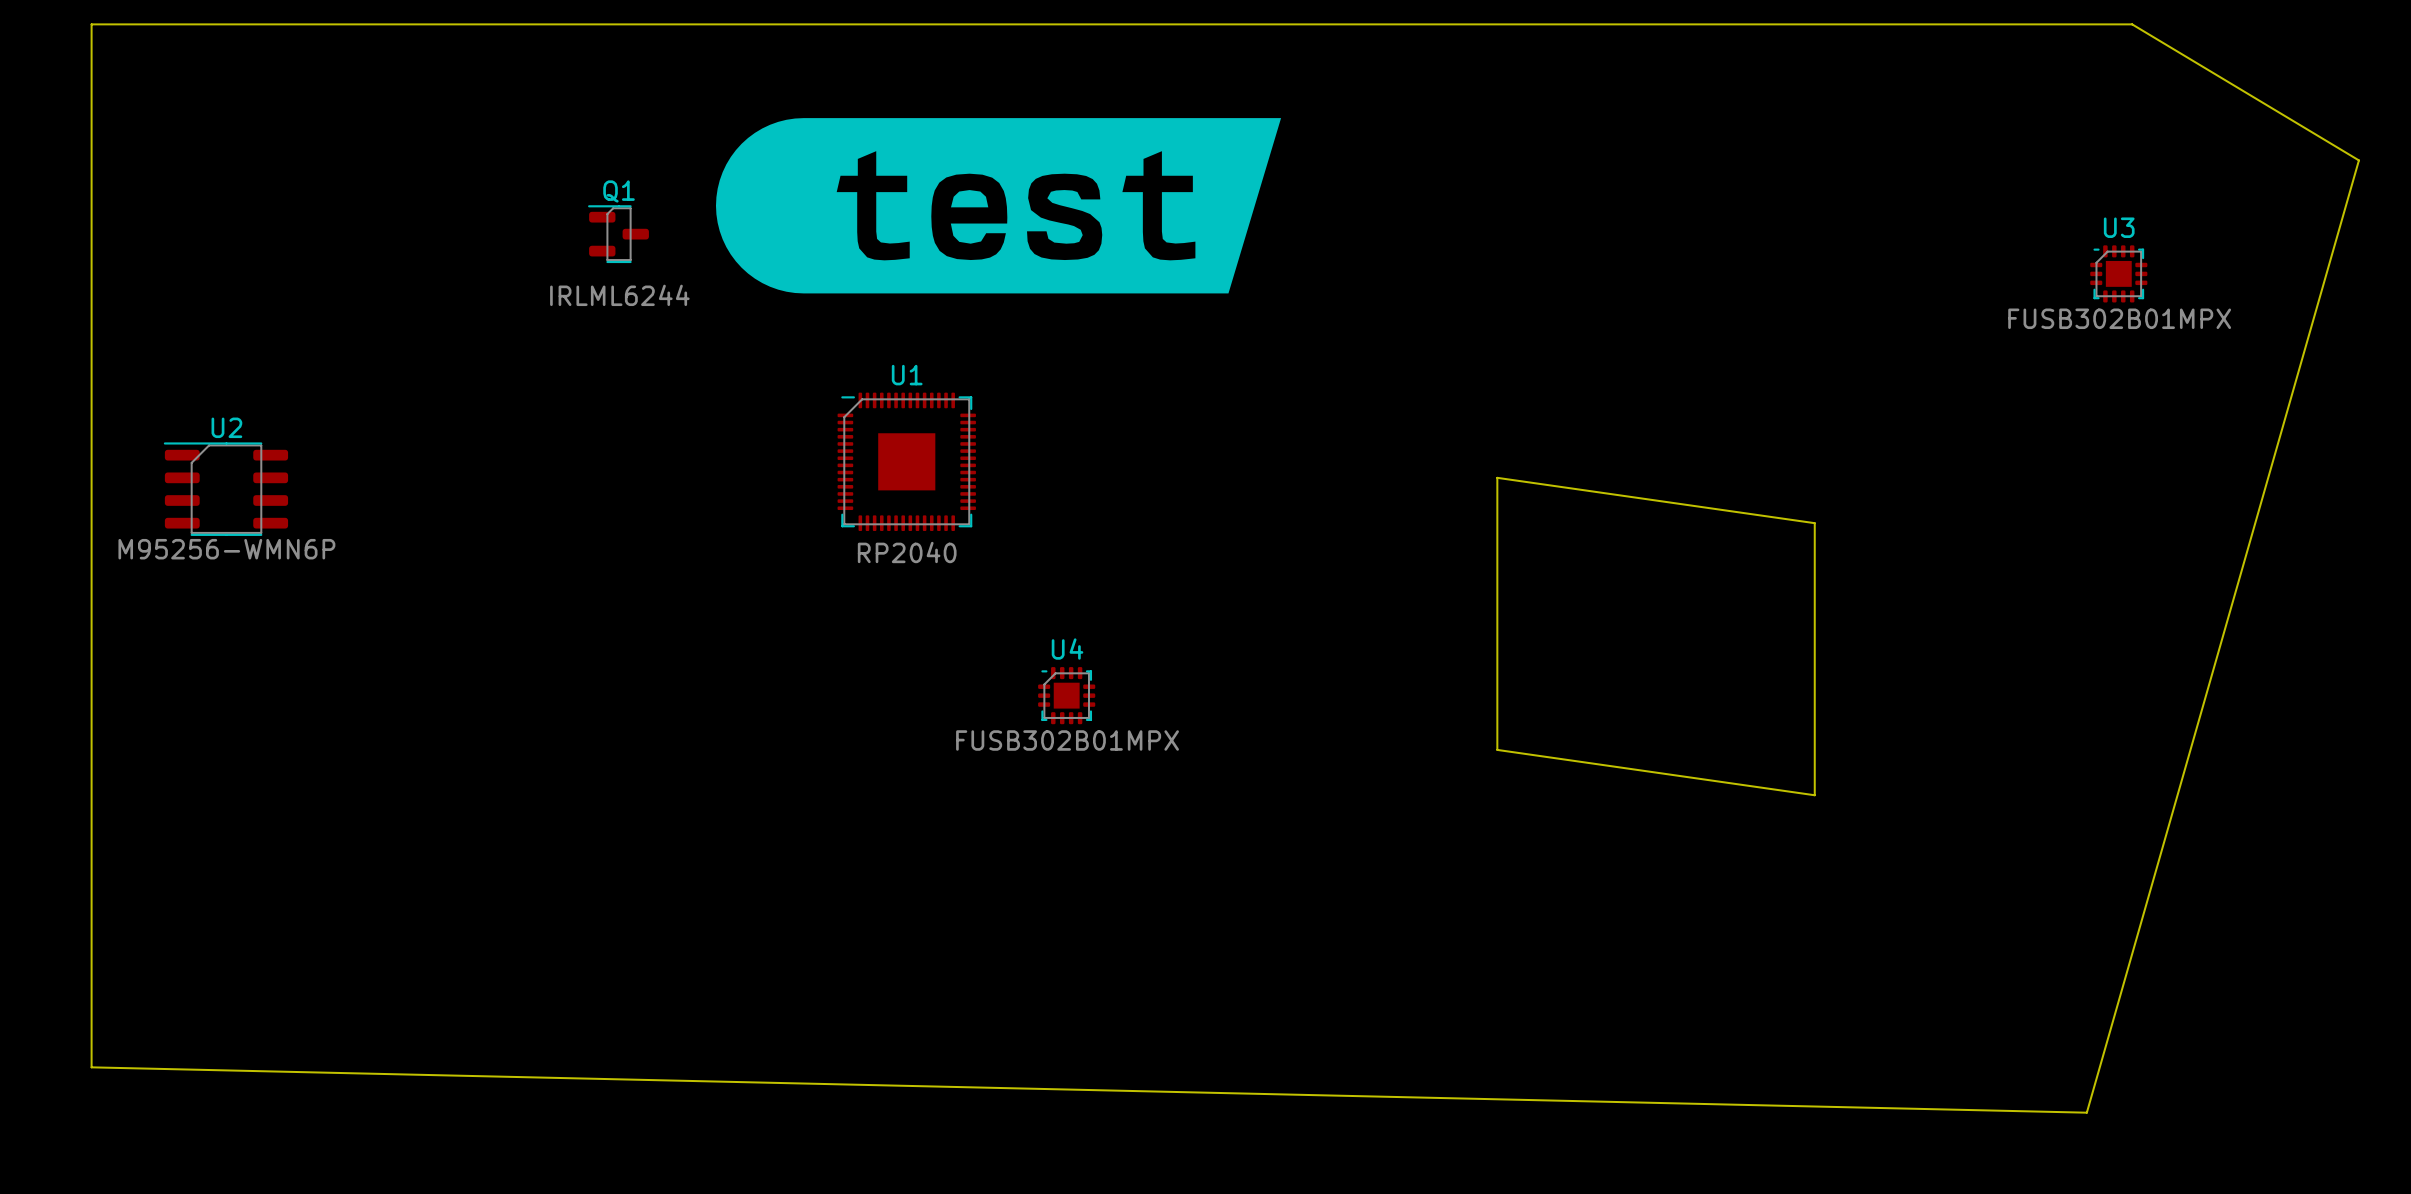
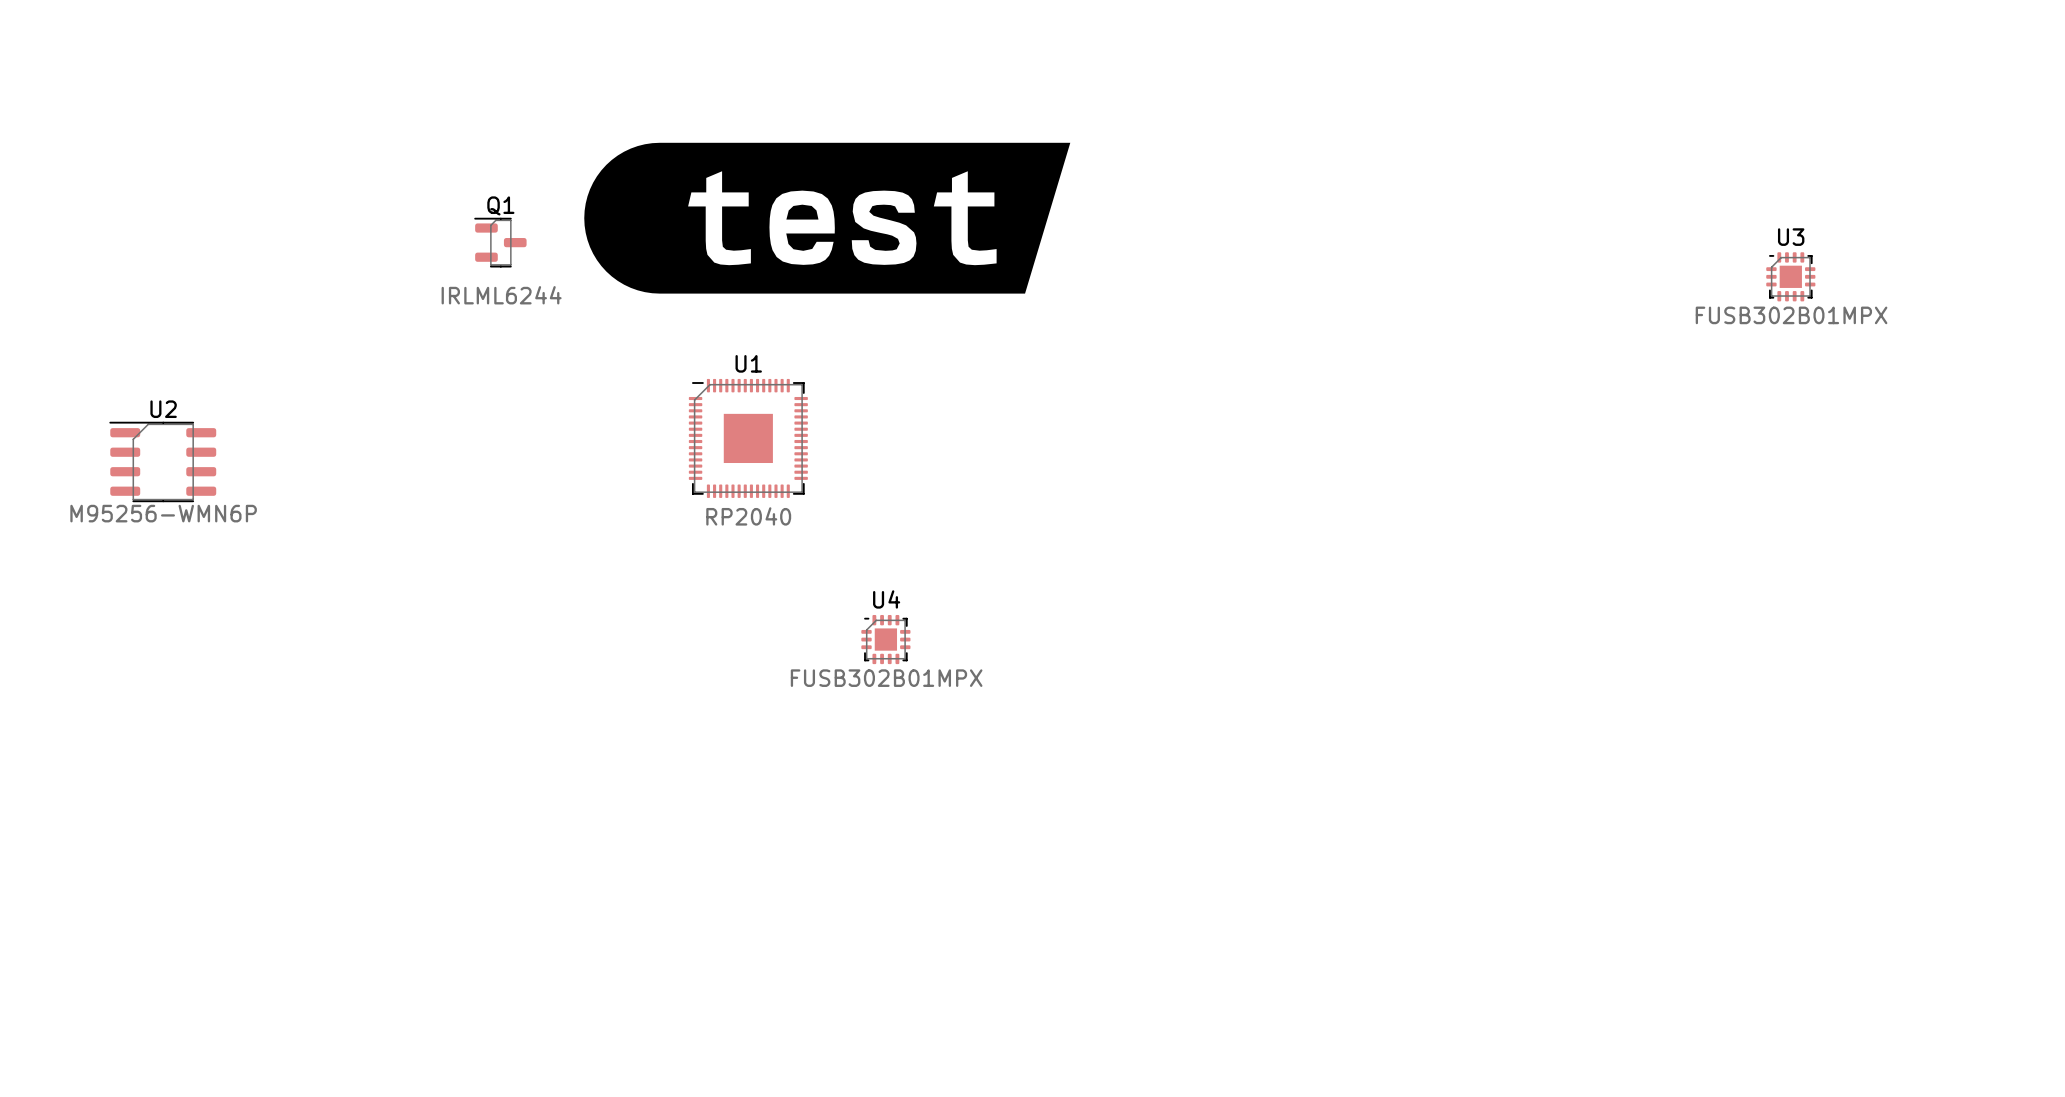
board edge: (91, 24) (91, 1067) (2086, 1112) (2358, 160) (2132, 24) (91, 24) -> none
board edge: (1497, 477) (1497, 749) (1814, 795) (1814, 523) (1497, 477) -> none

